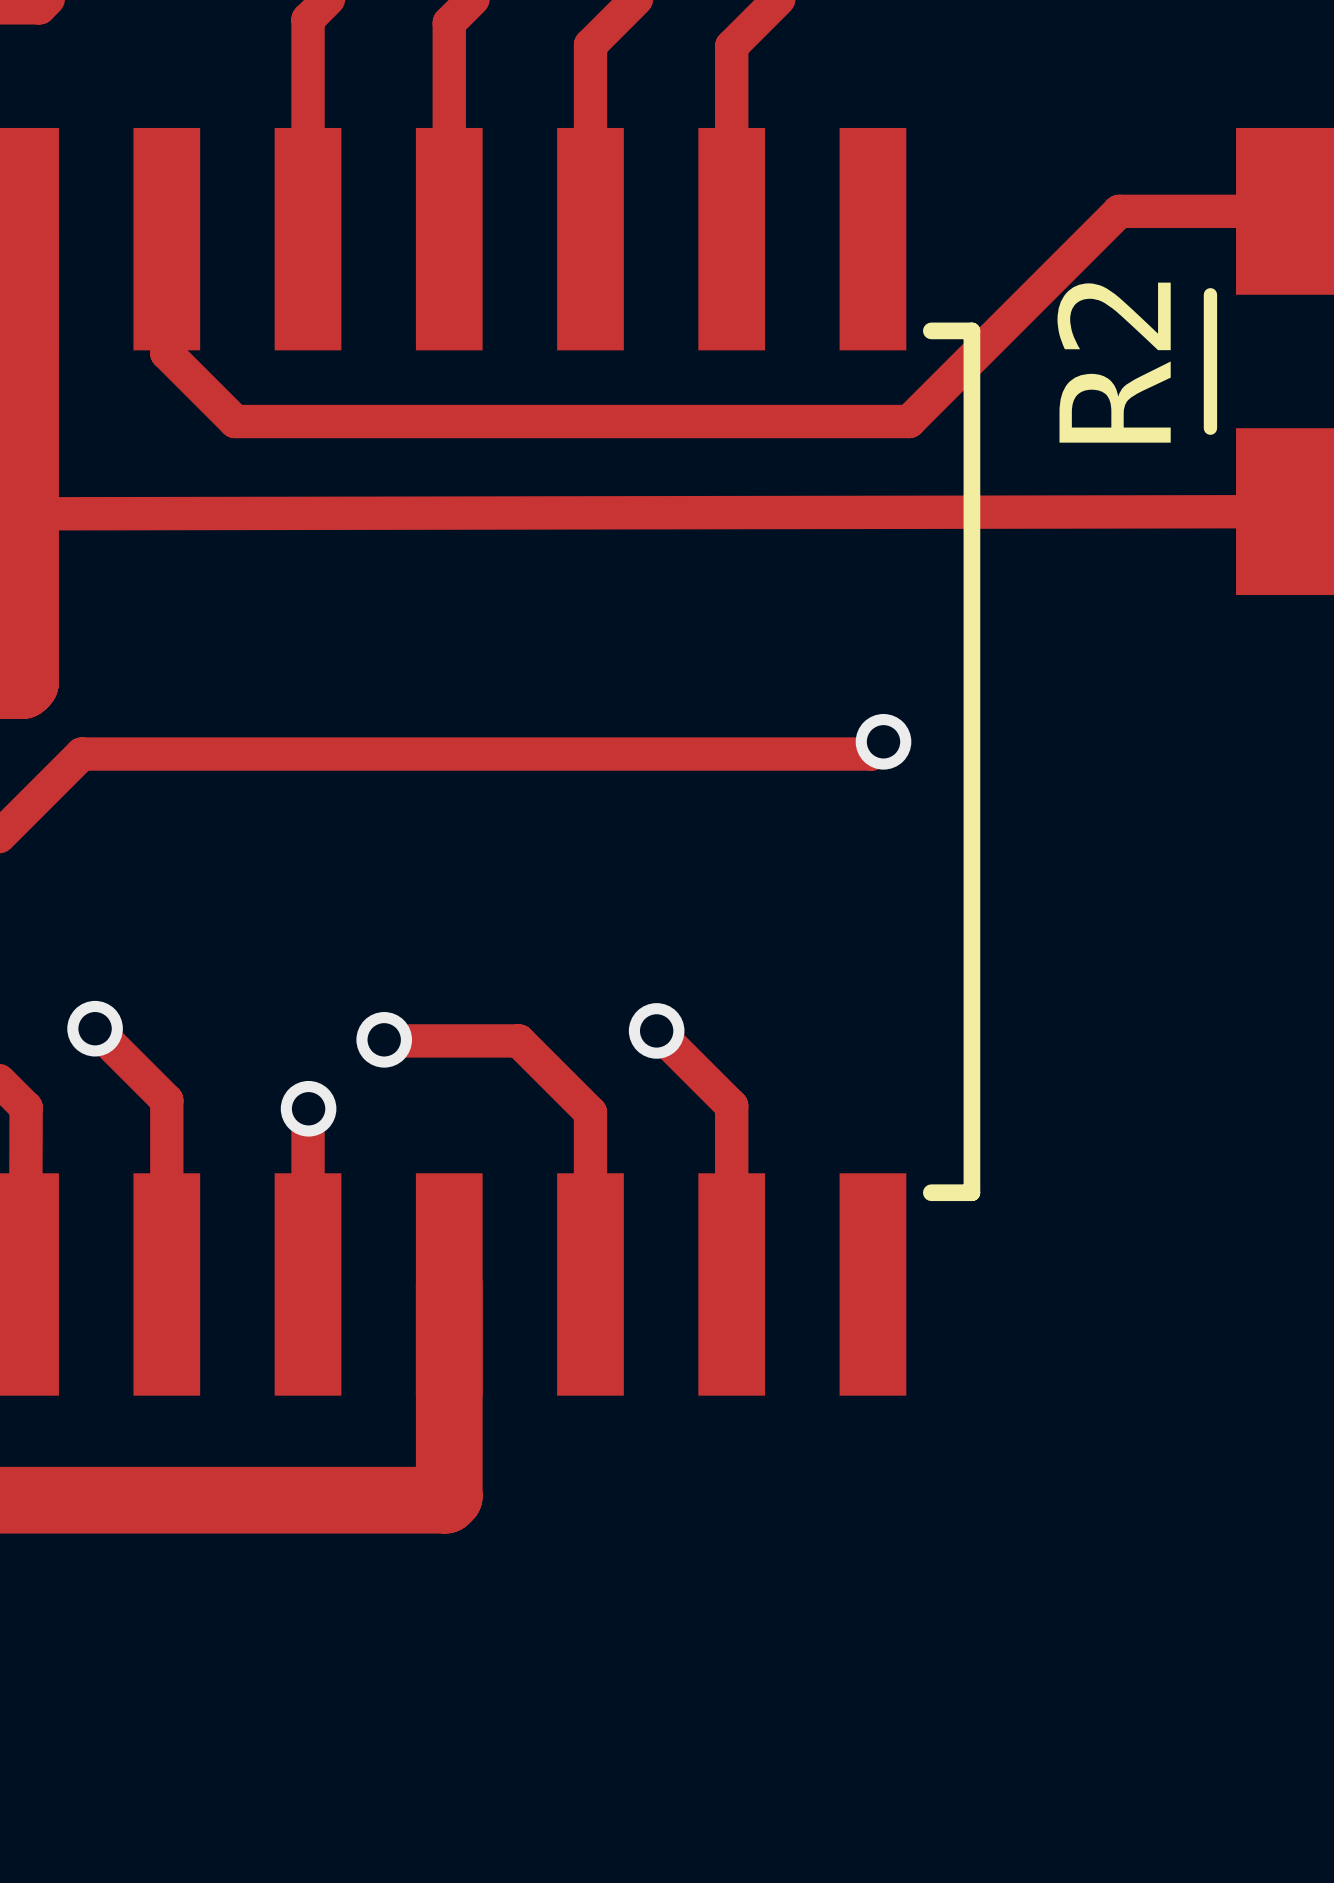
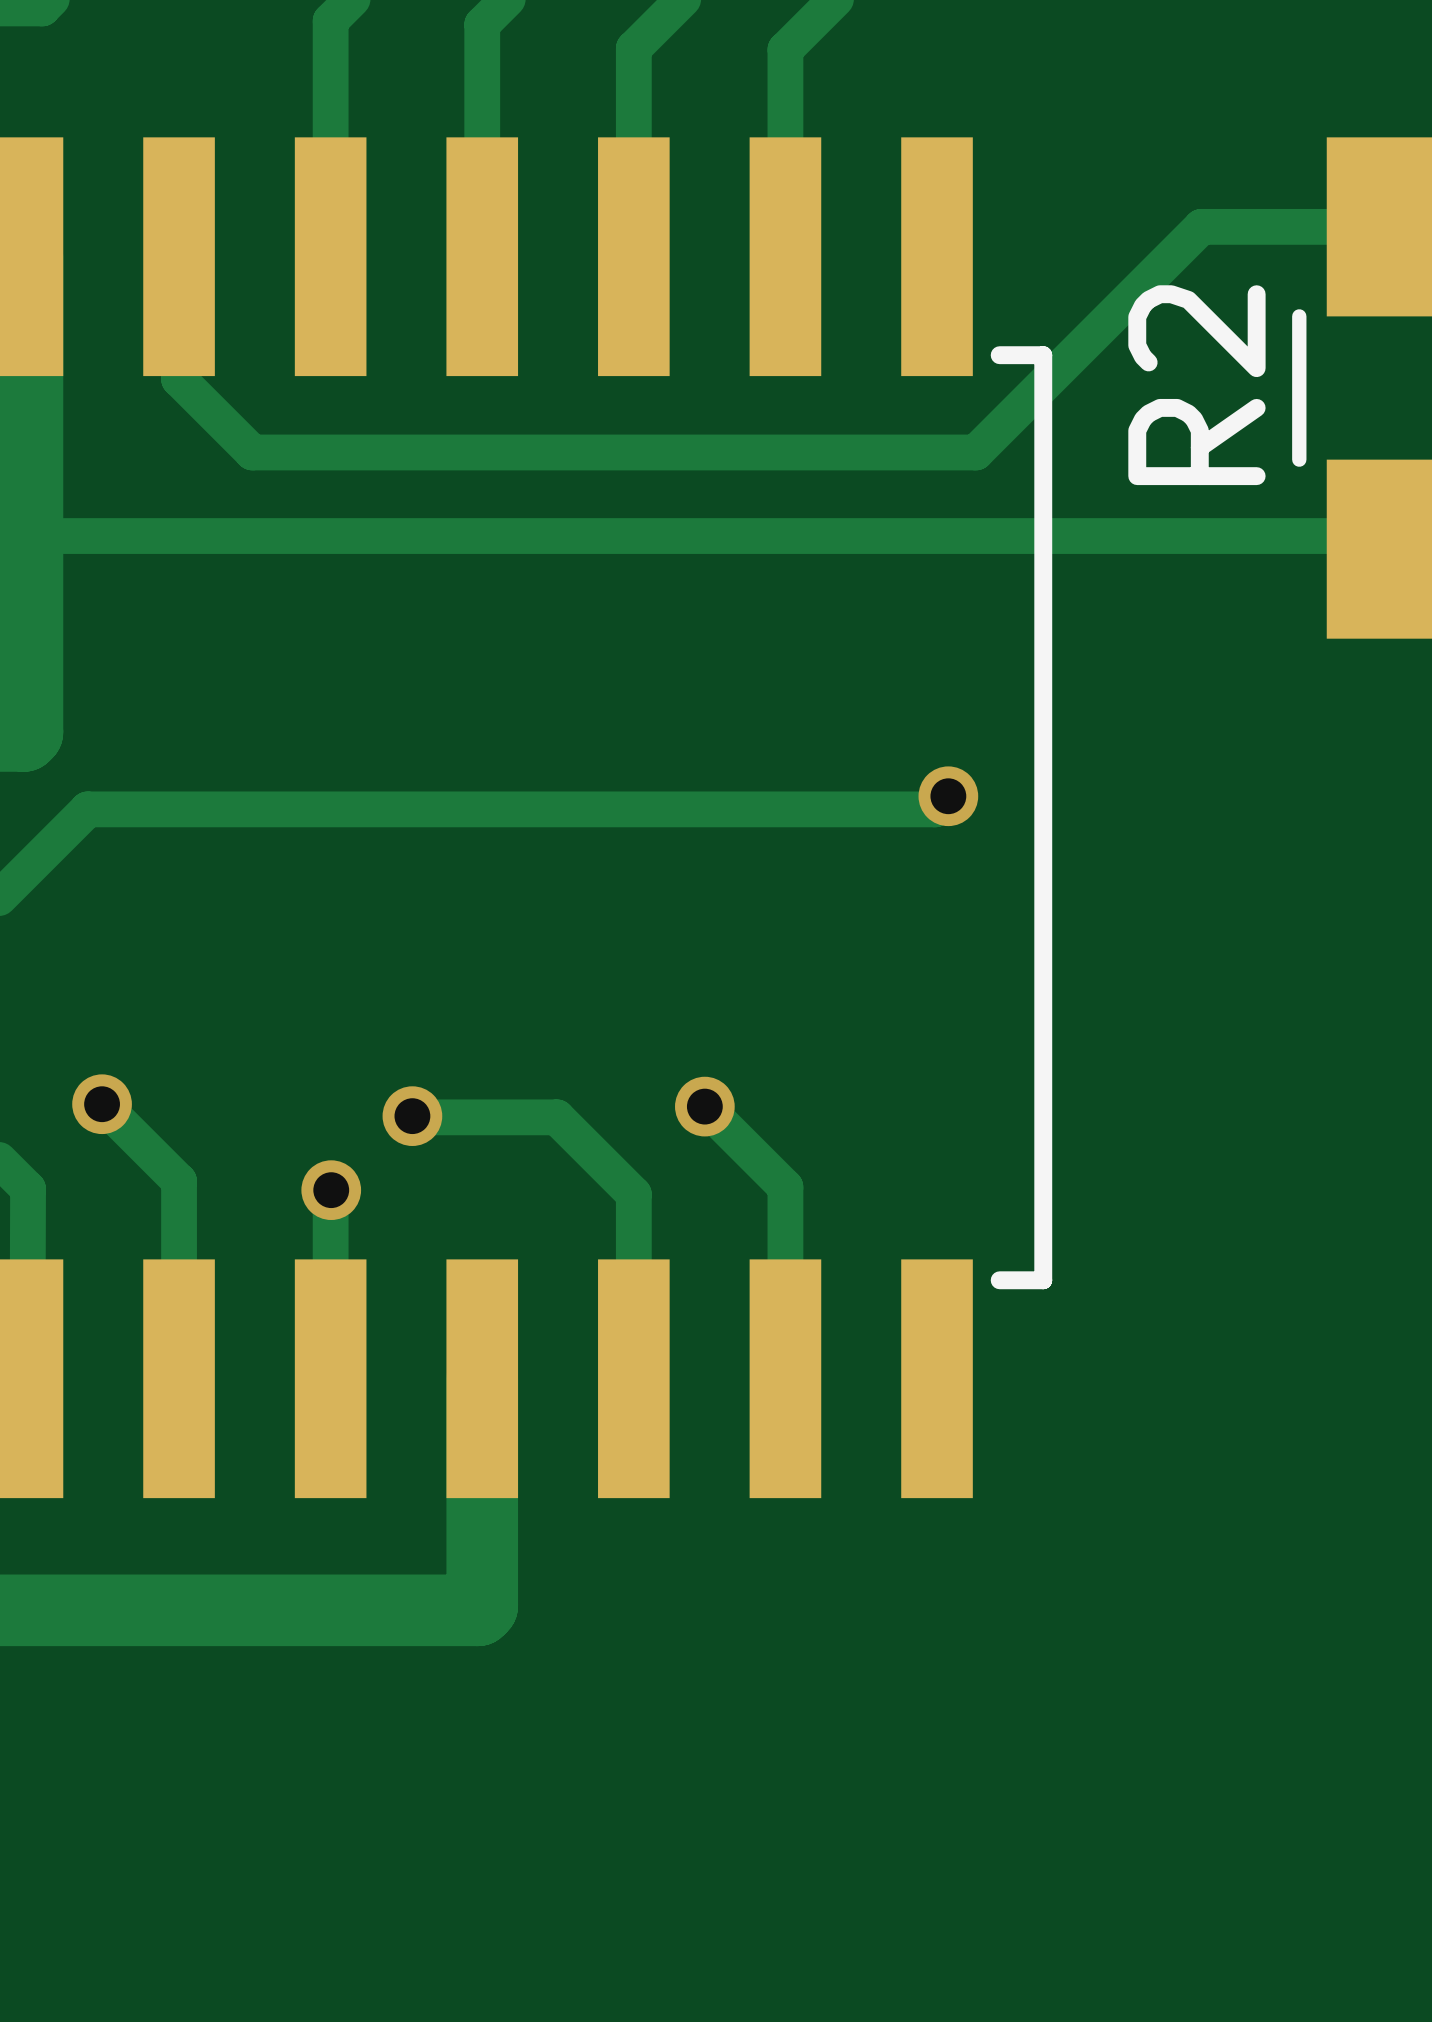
track: (1308, 511) (28, 513) -> (1404, 549) (1391, 536) (27, 536)

